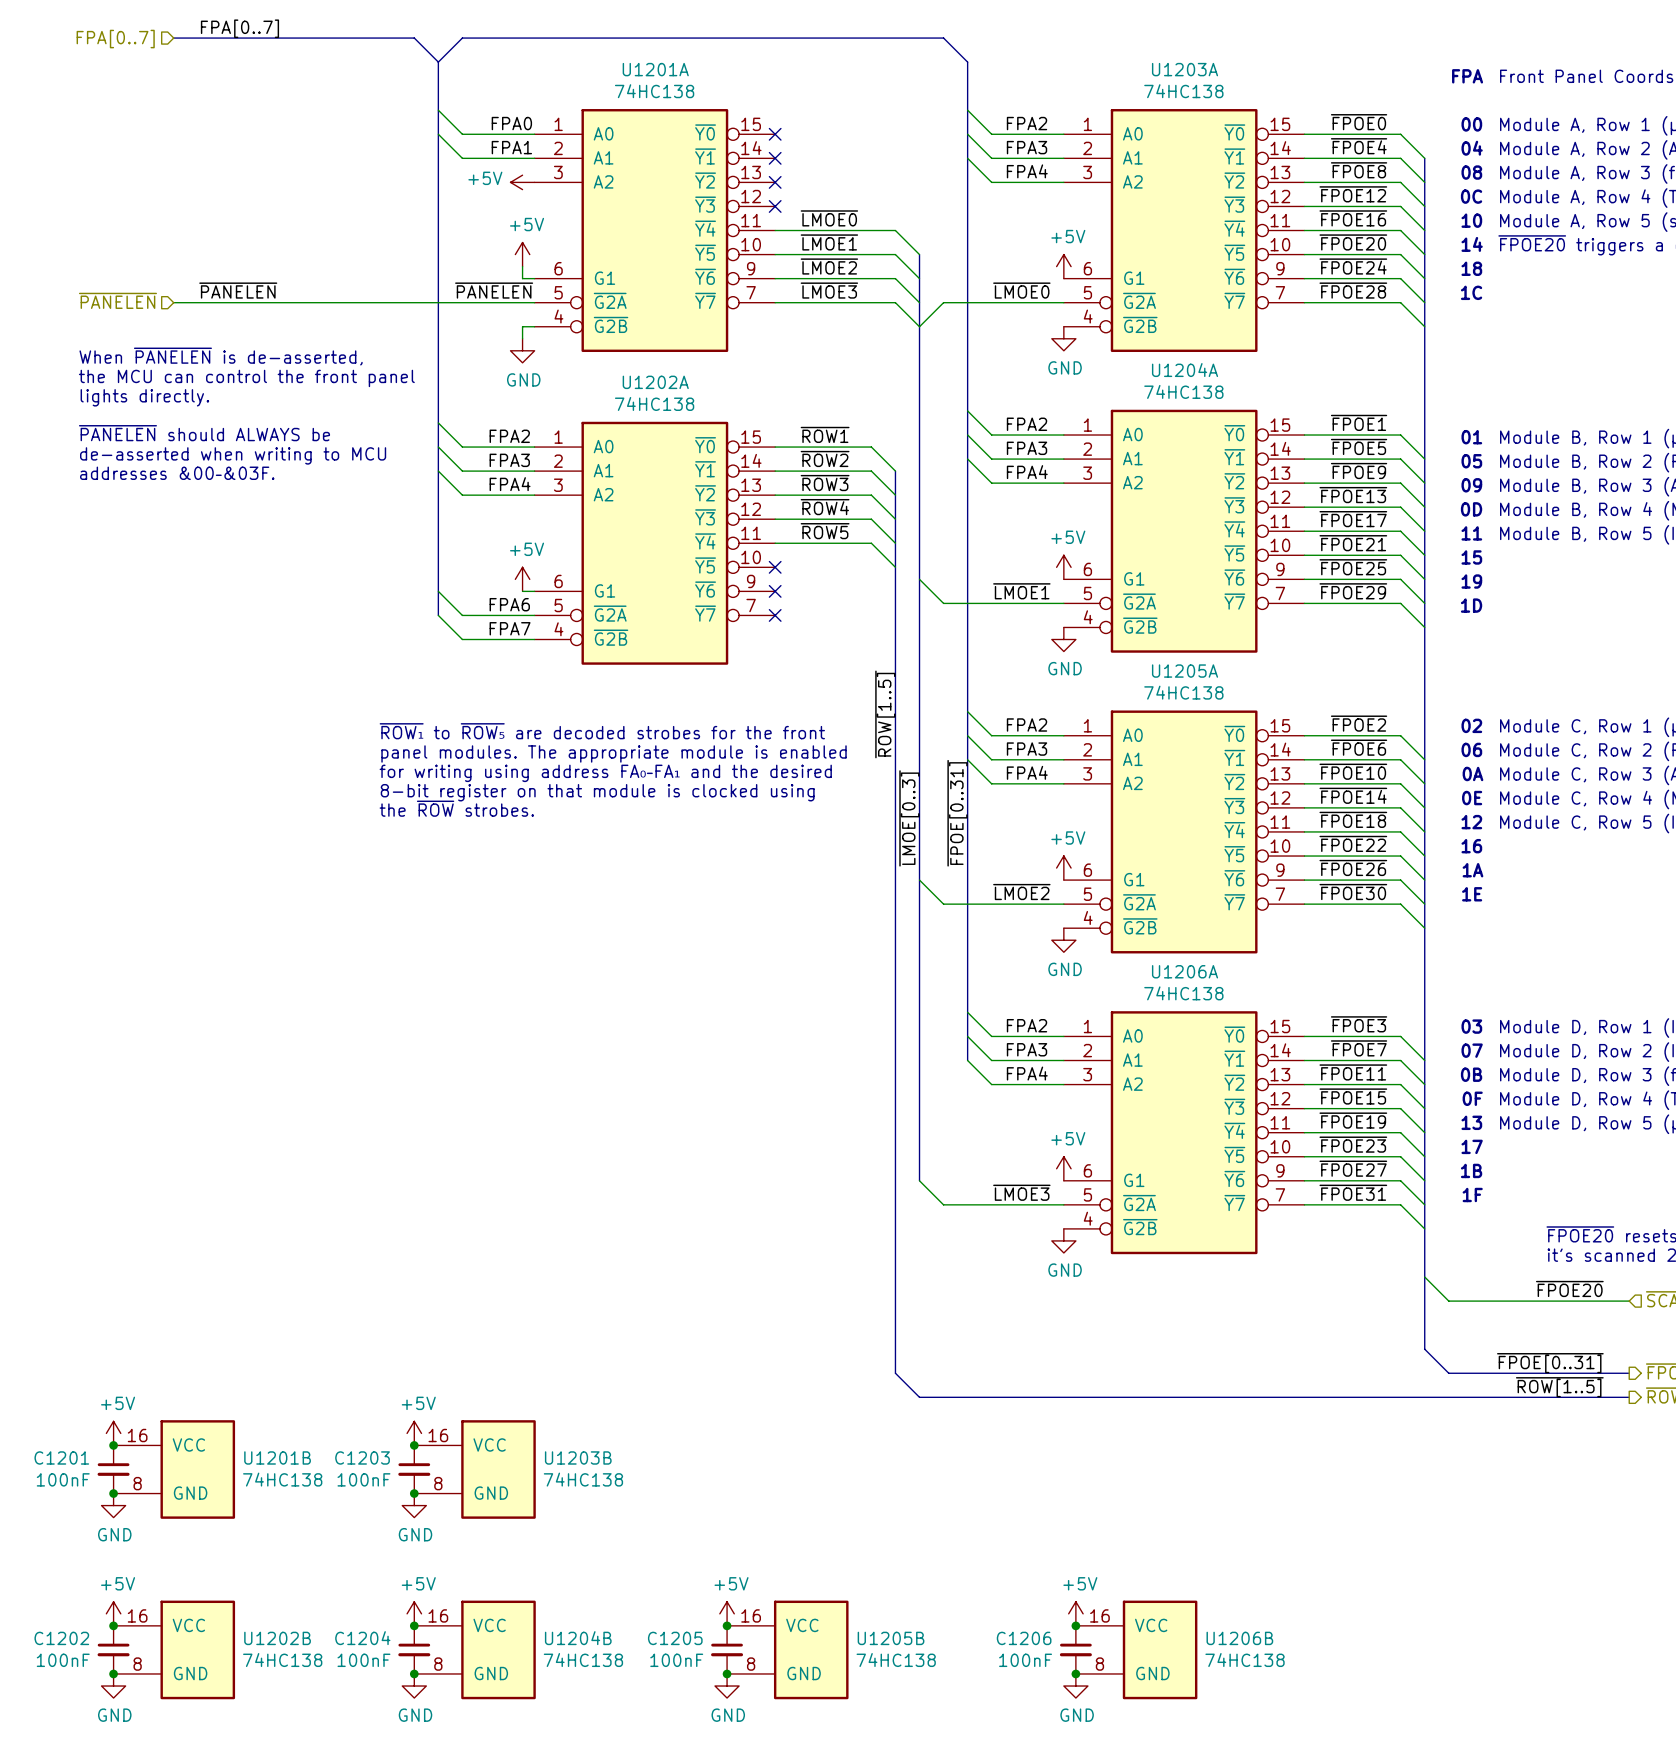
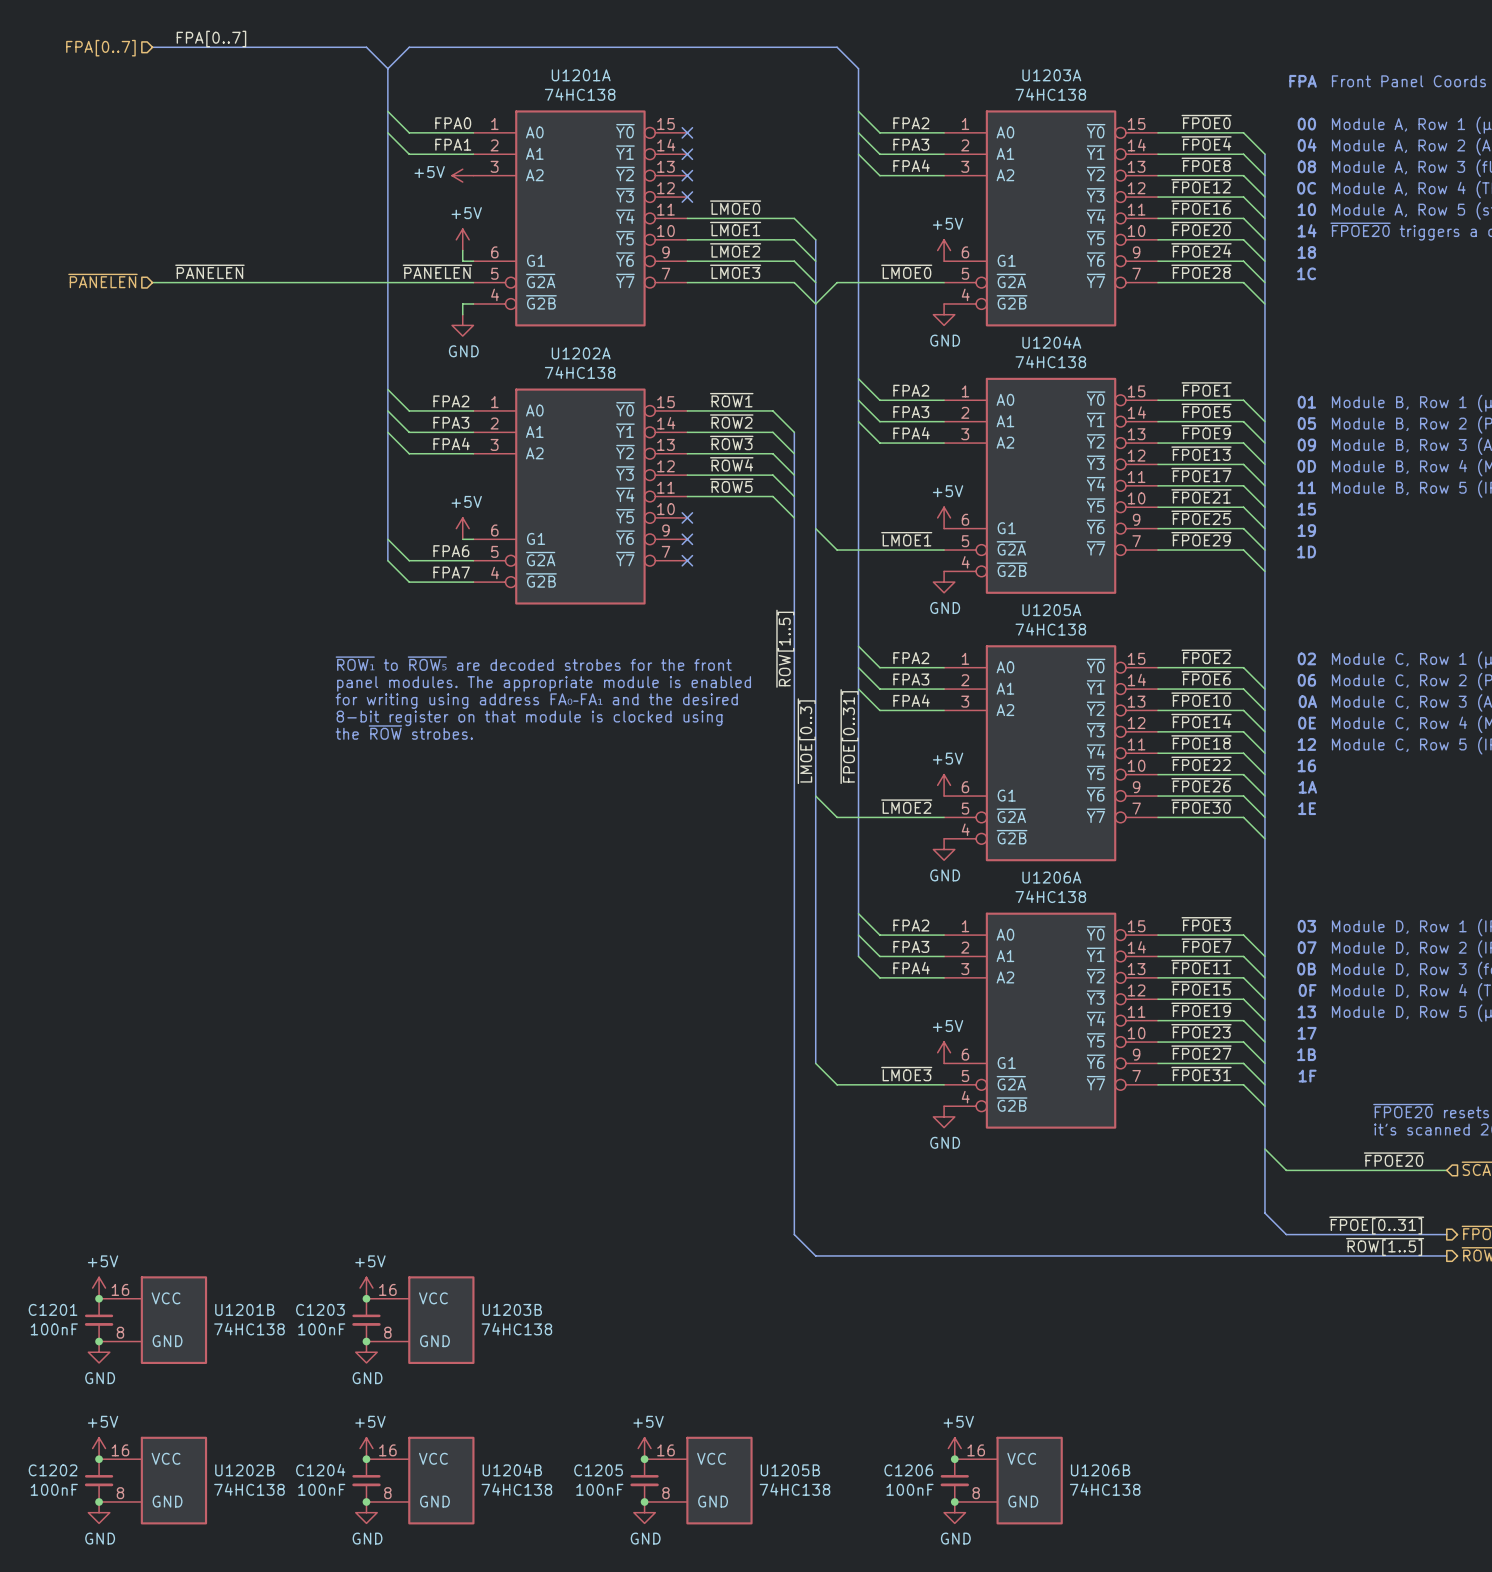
text: When ~{PANELEN} is de-asserted, (221, 356) -> none
text: the MCU can control the front panel (246, 378) -> none
text: lights directly. (144, 397) -> none
text: ~{PANELEN} should ALWAYS be (204, 433) -> none
text: de-asserted when writing to MCU (233, 455) -> none
text: addresses &00–&03F. (177, 473) -> none

